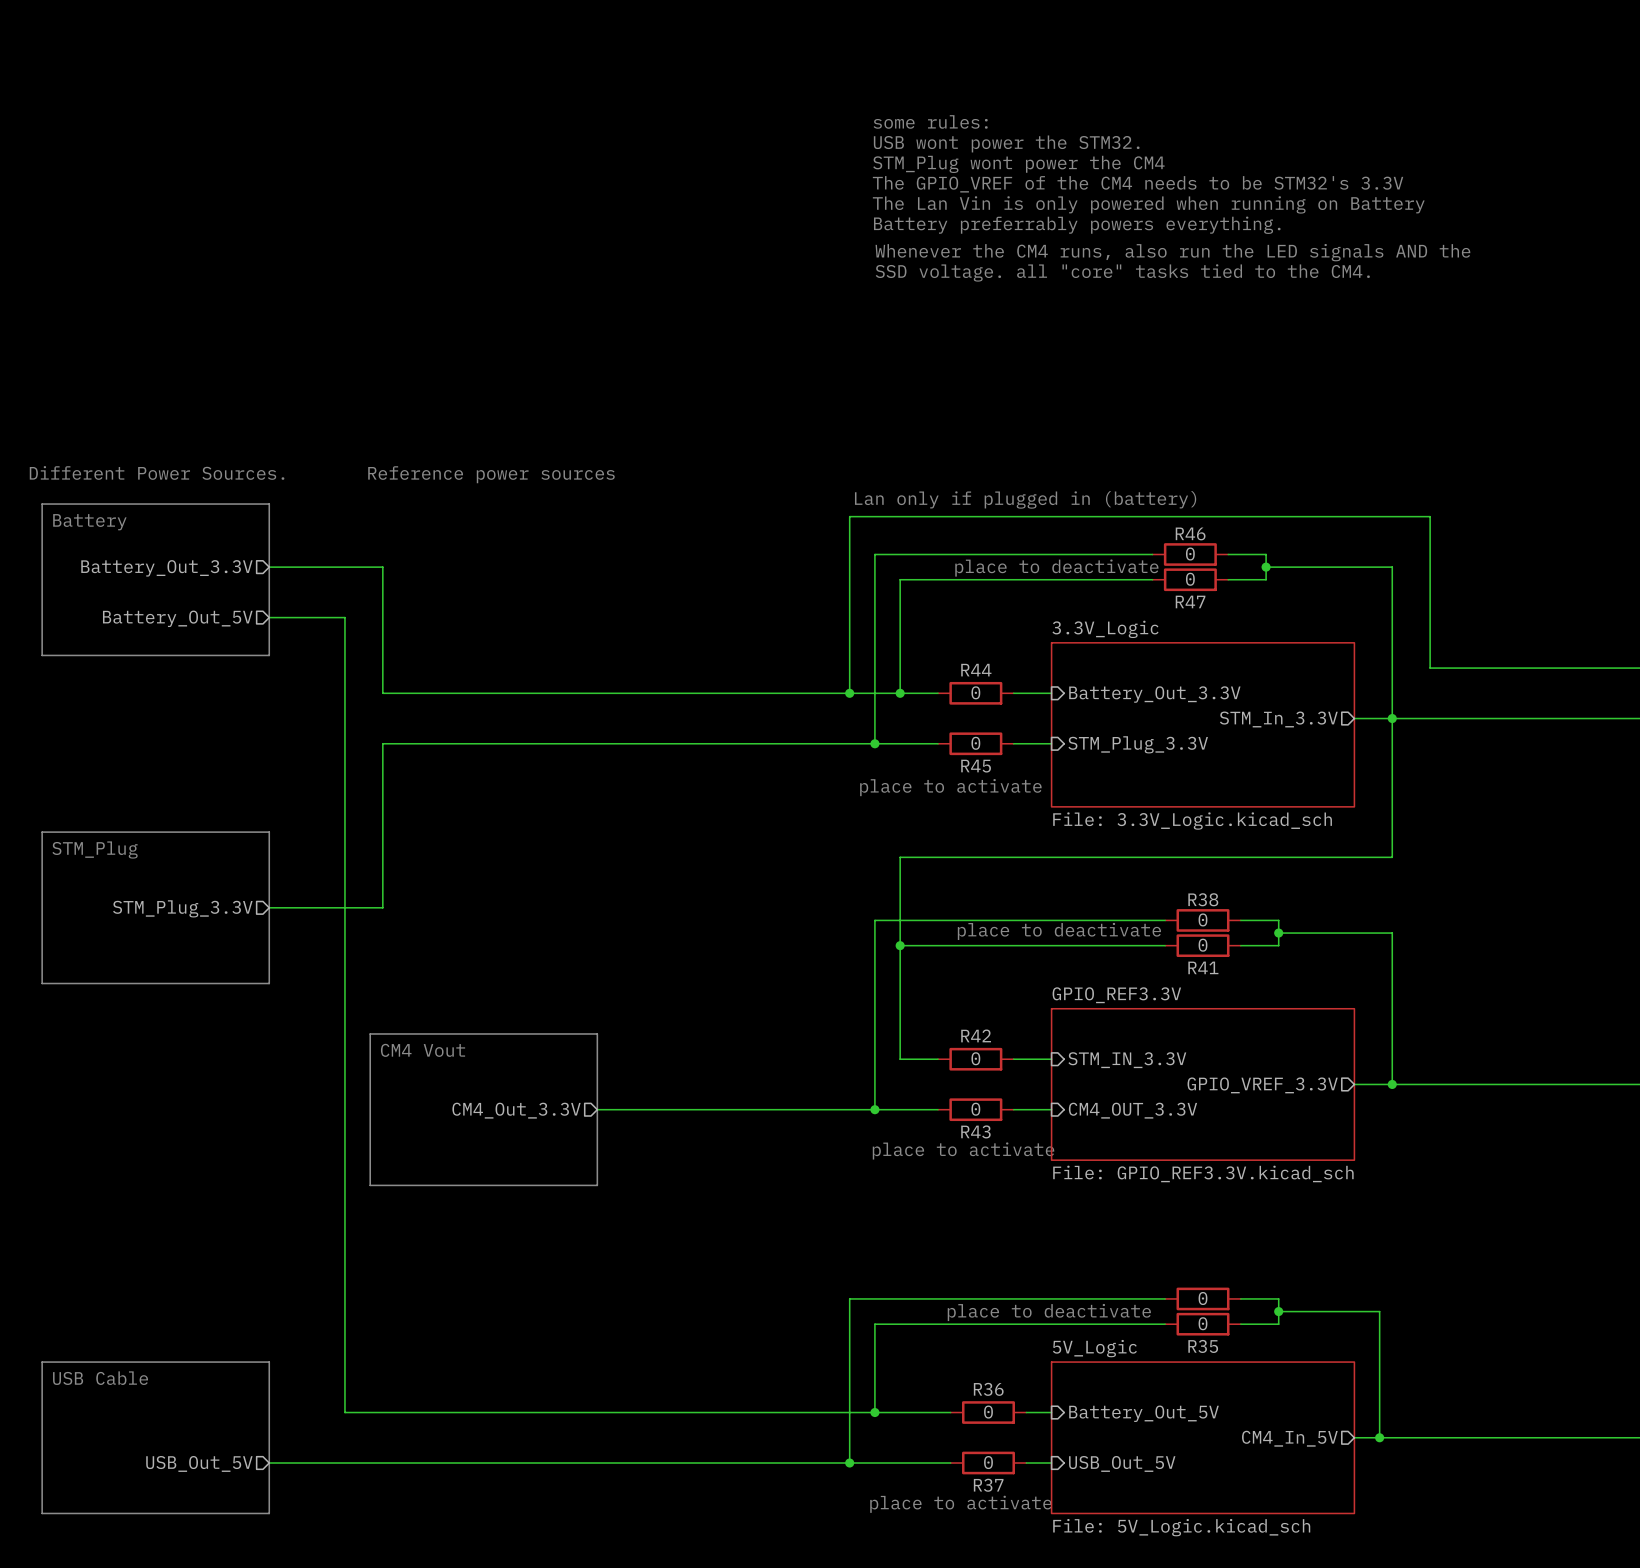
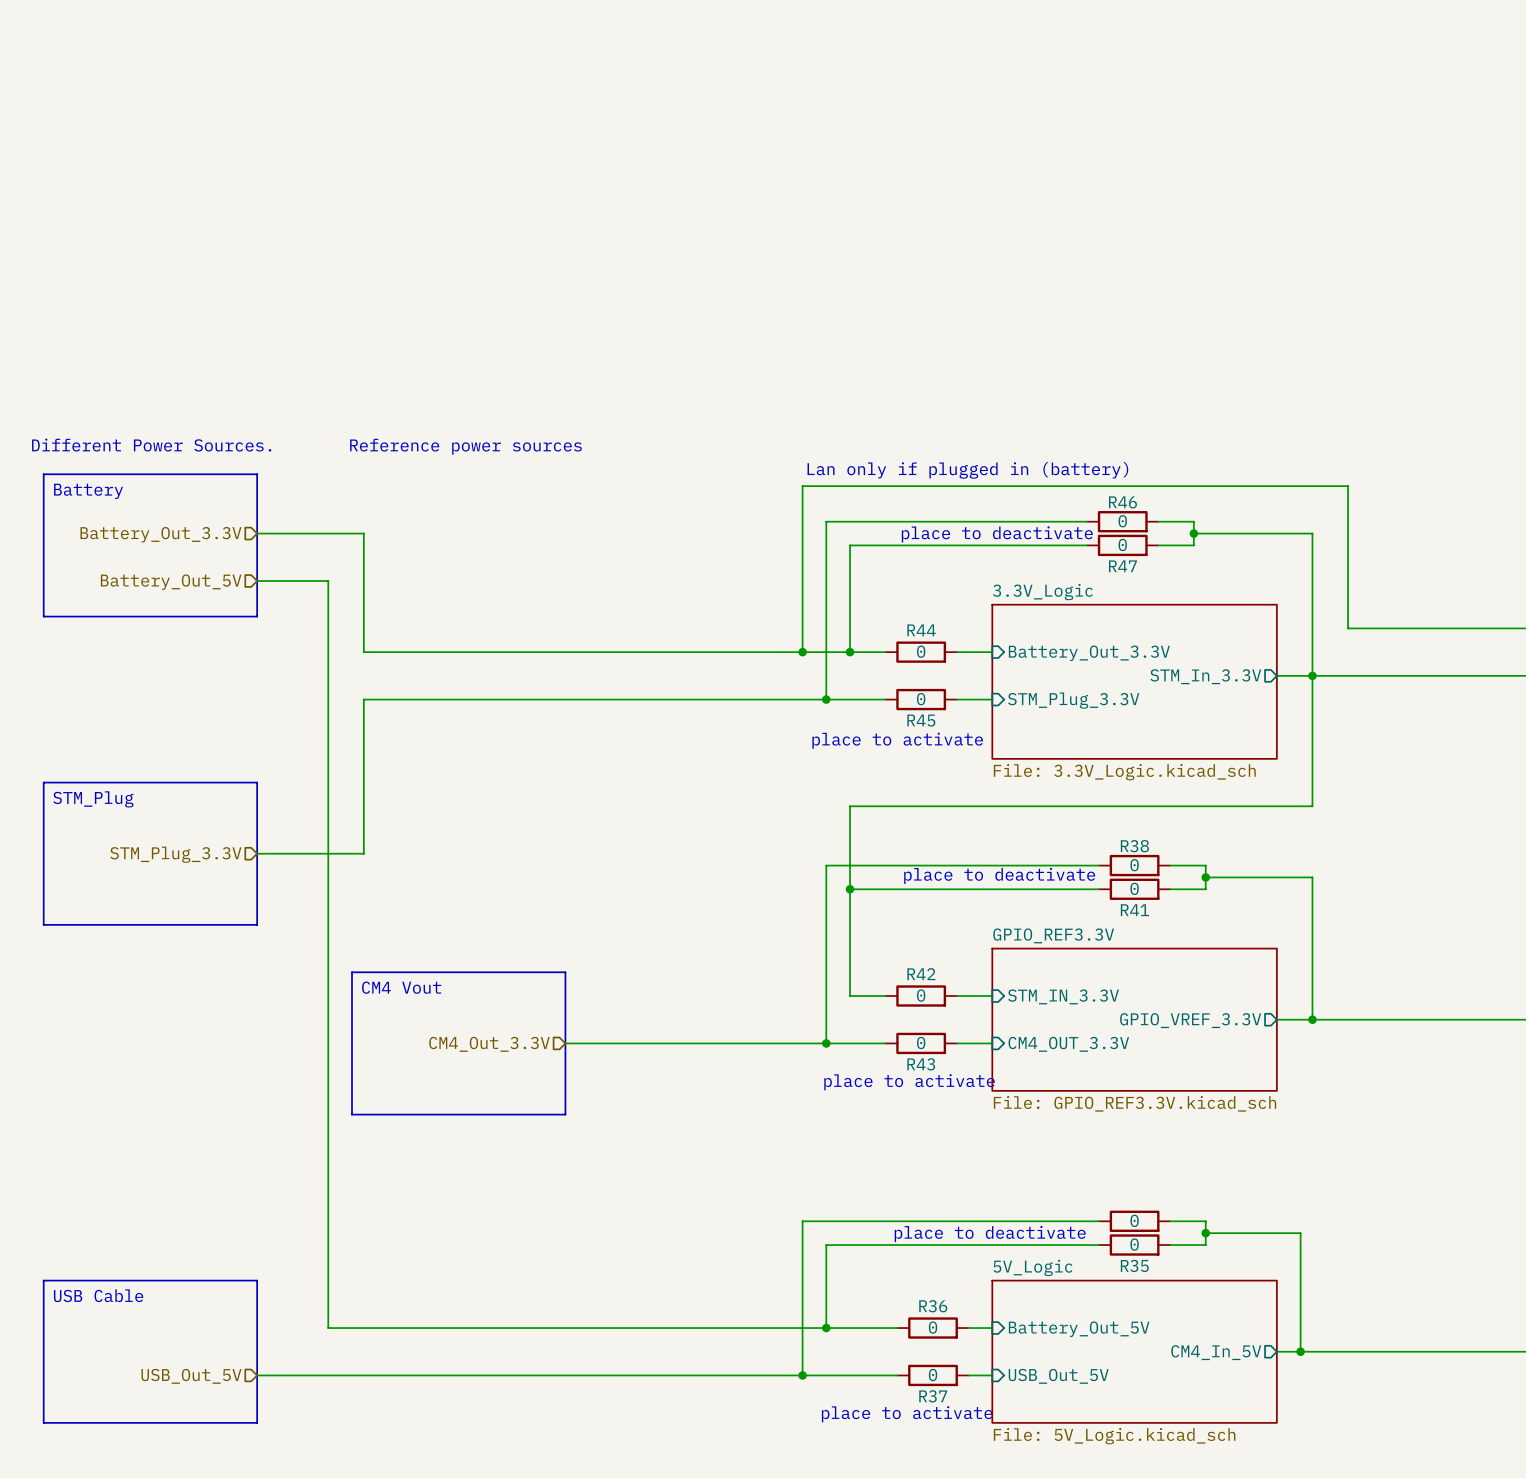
text: some rules: (930, 121) -> none
text: USB wont power the STM32. (1006, 143) -> none
text: STM_Plug wont power the CM4 (1018, 164) -> none
text: The GPIO_VREF of the CM4 needs to be STM32's 3.3V (1138, 184) -> none
text: The Lan Vin is only powered when running on Battery (1148, 204) -> none
text: Battery preferrably powers everything. (1077, 225) -> none
text: Whenever the CM4 runs, also run the LED signals AND the (1172, 252) -> none
text: SSD voltage. all "core" tasks tied to the CM4. (1122, 272) -> none

